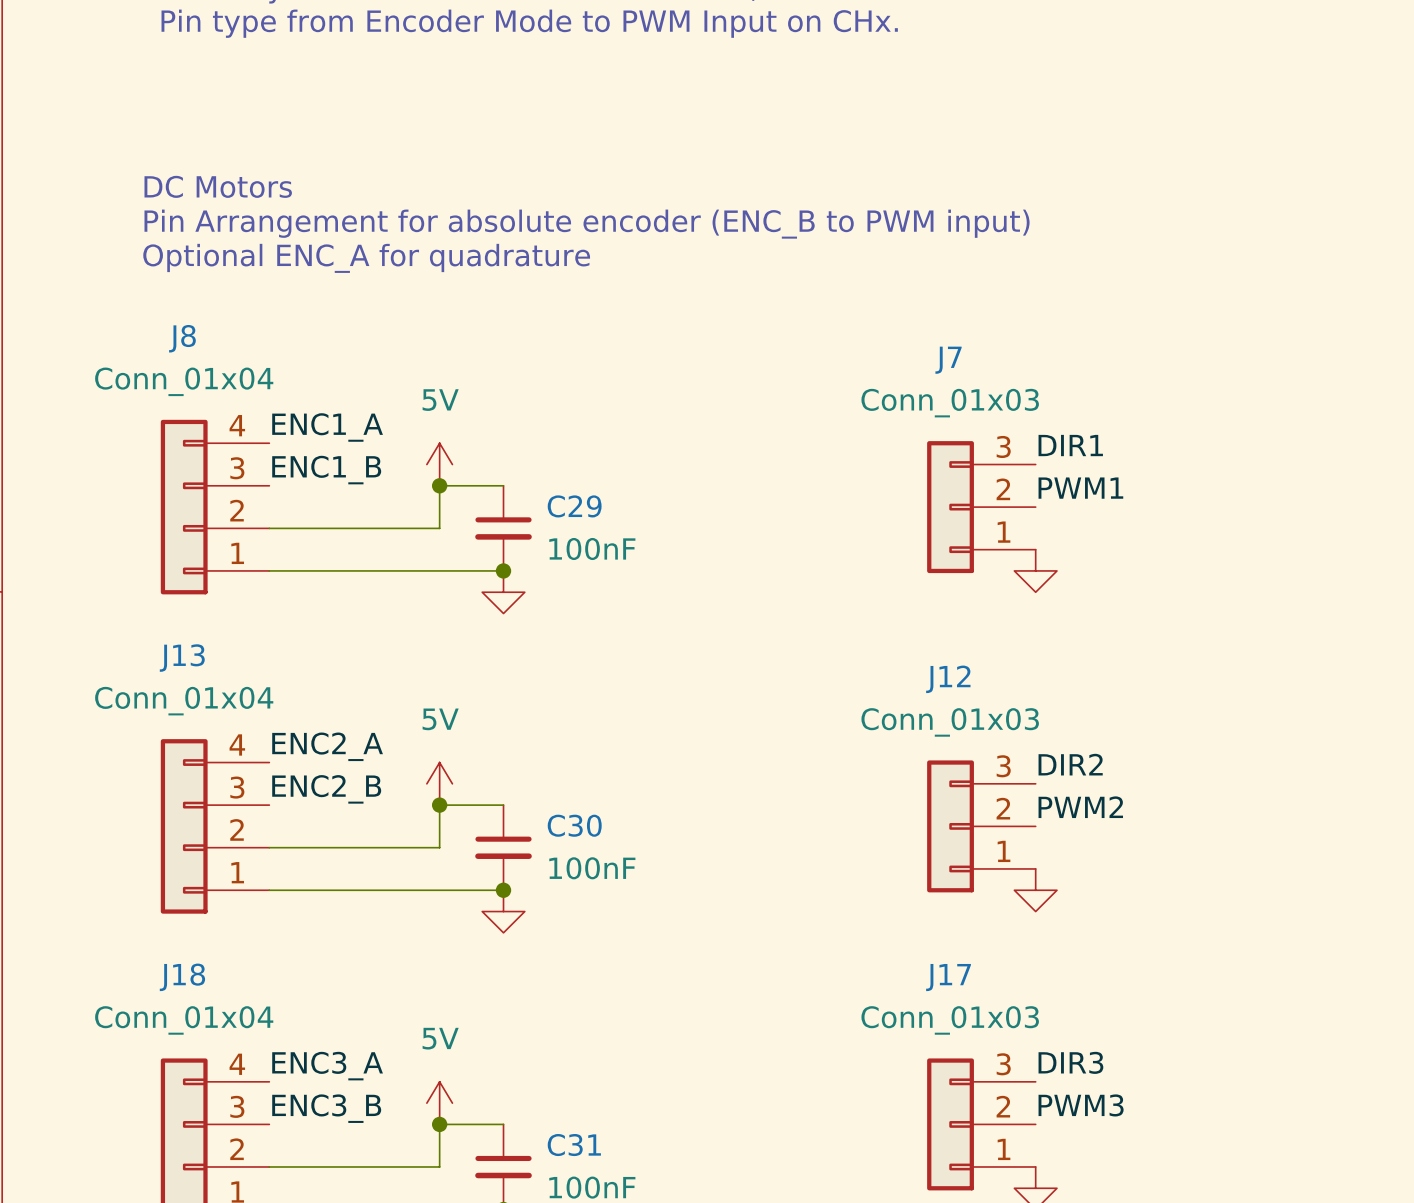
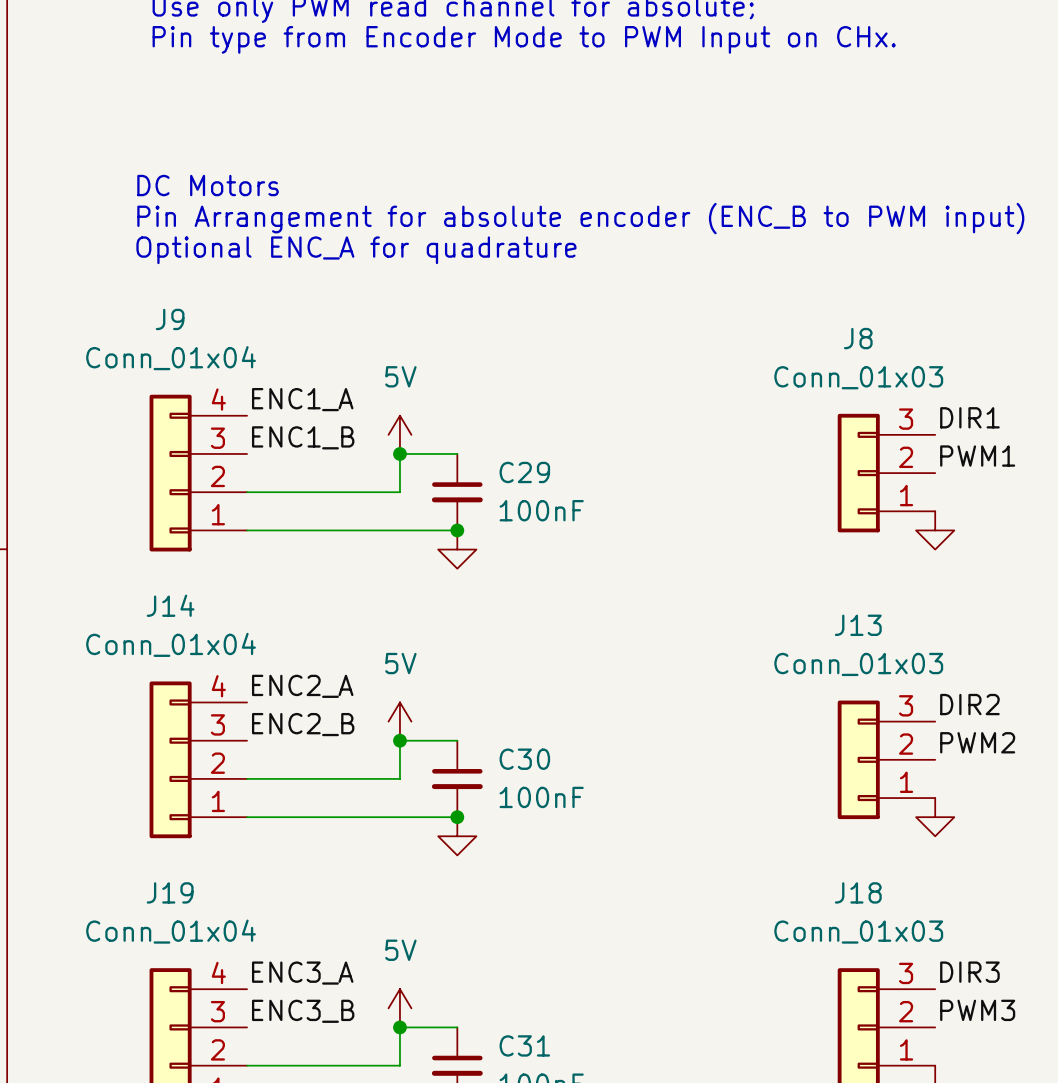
J8 name: J8 (182, 338) -> J9 (170, 319)
J7 name: J7 (948, 360) -> J8 (858, 338)
J13 name: J13 (182, 658) -> J14 (170, 605)
J12 name: J12 (948, 679) -> J13 (858, 625)
J18 name: J18 (182, 977) -> J19 (170, 892)
J17 name: J17 (948, 977) -> J18 (858, 892)

